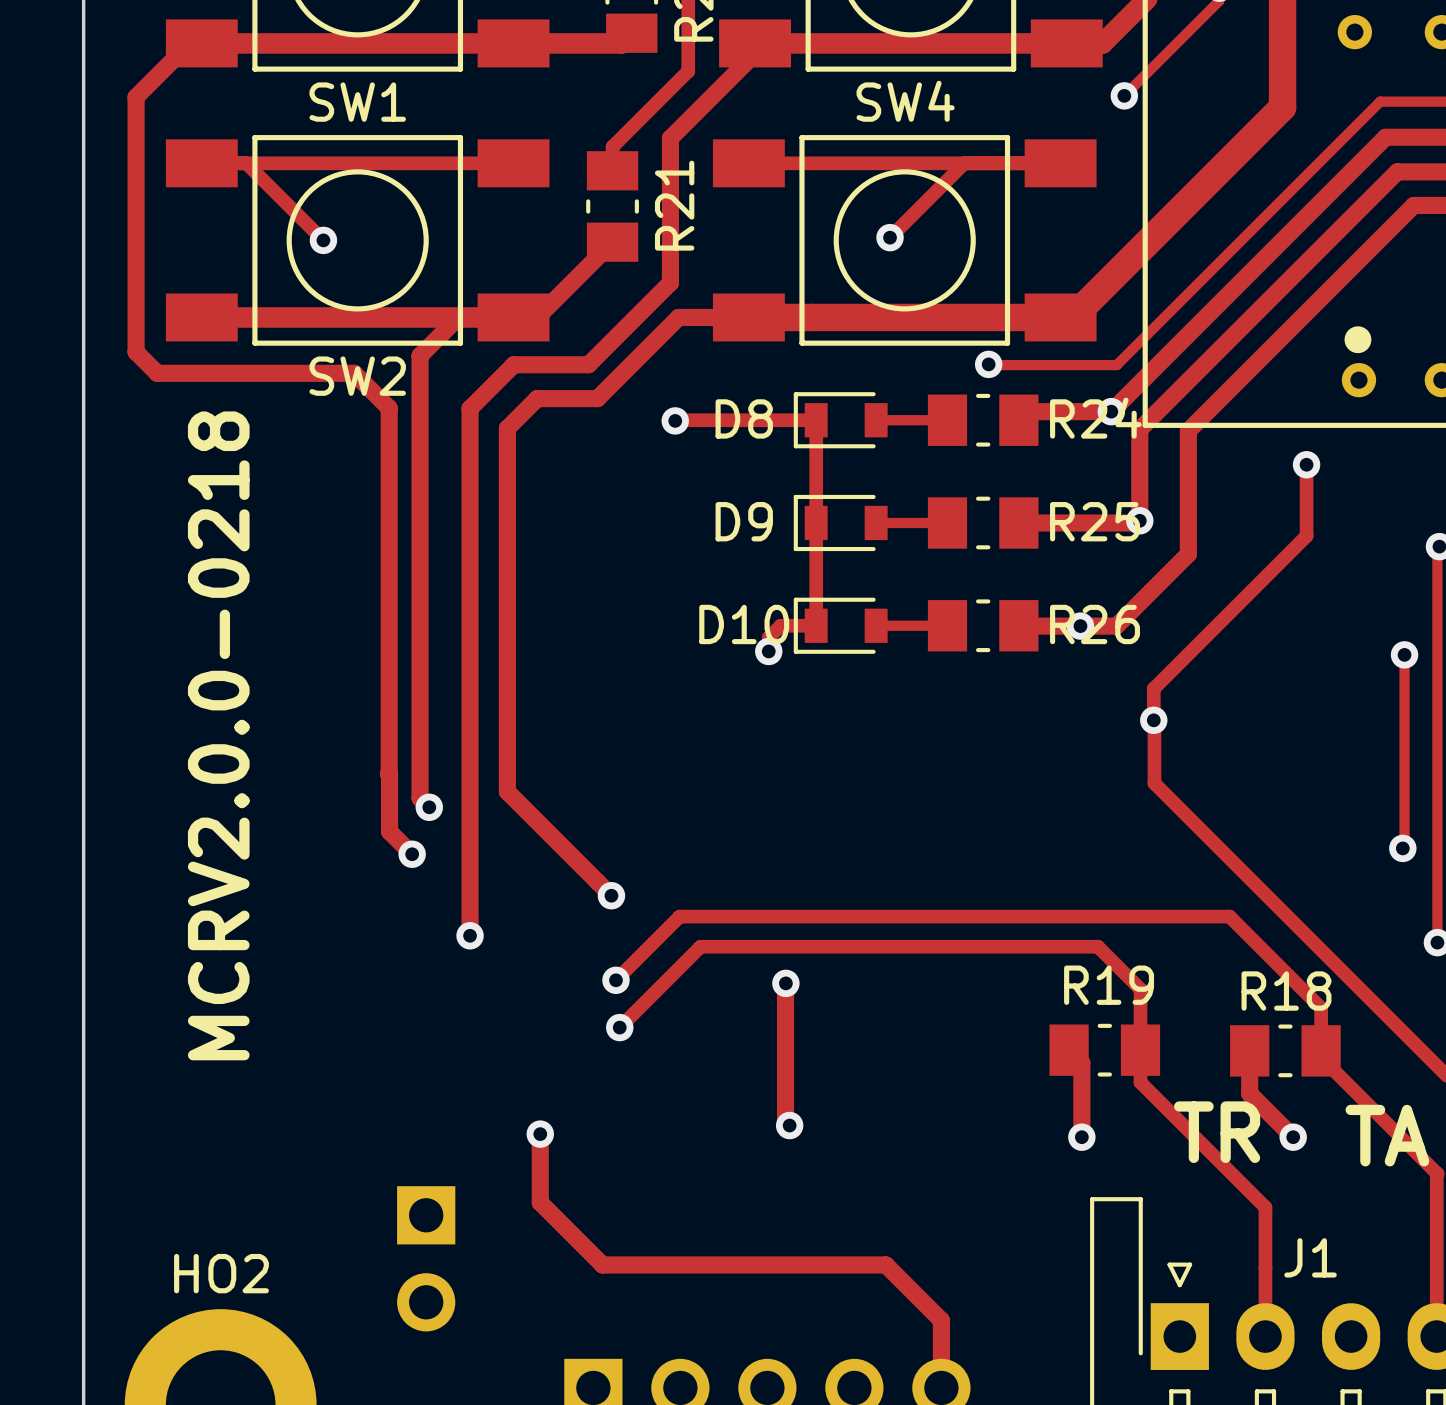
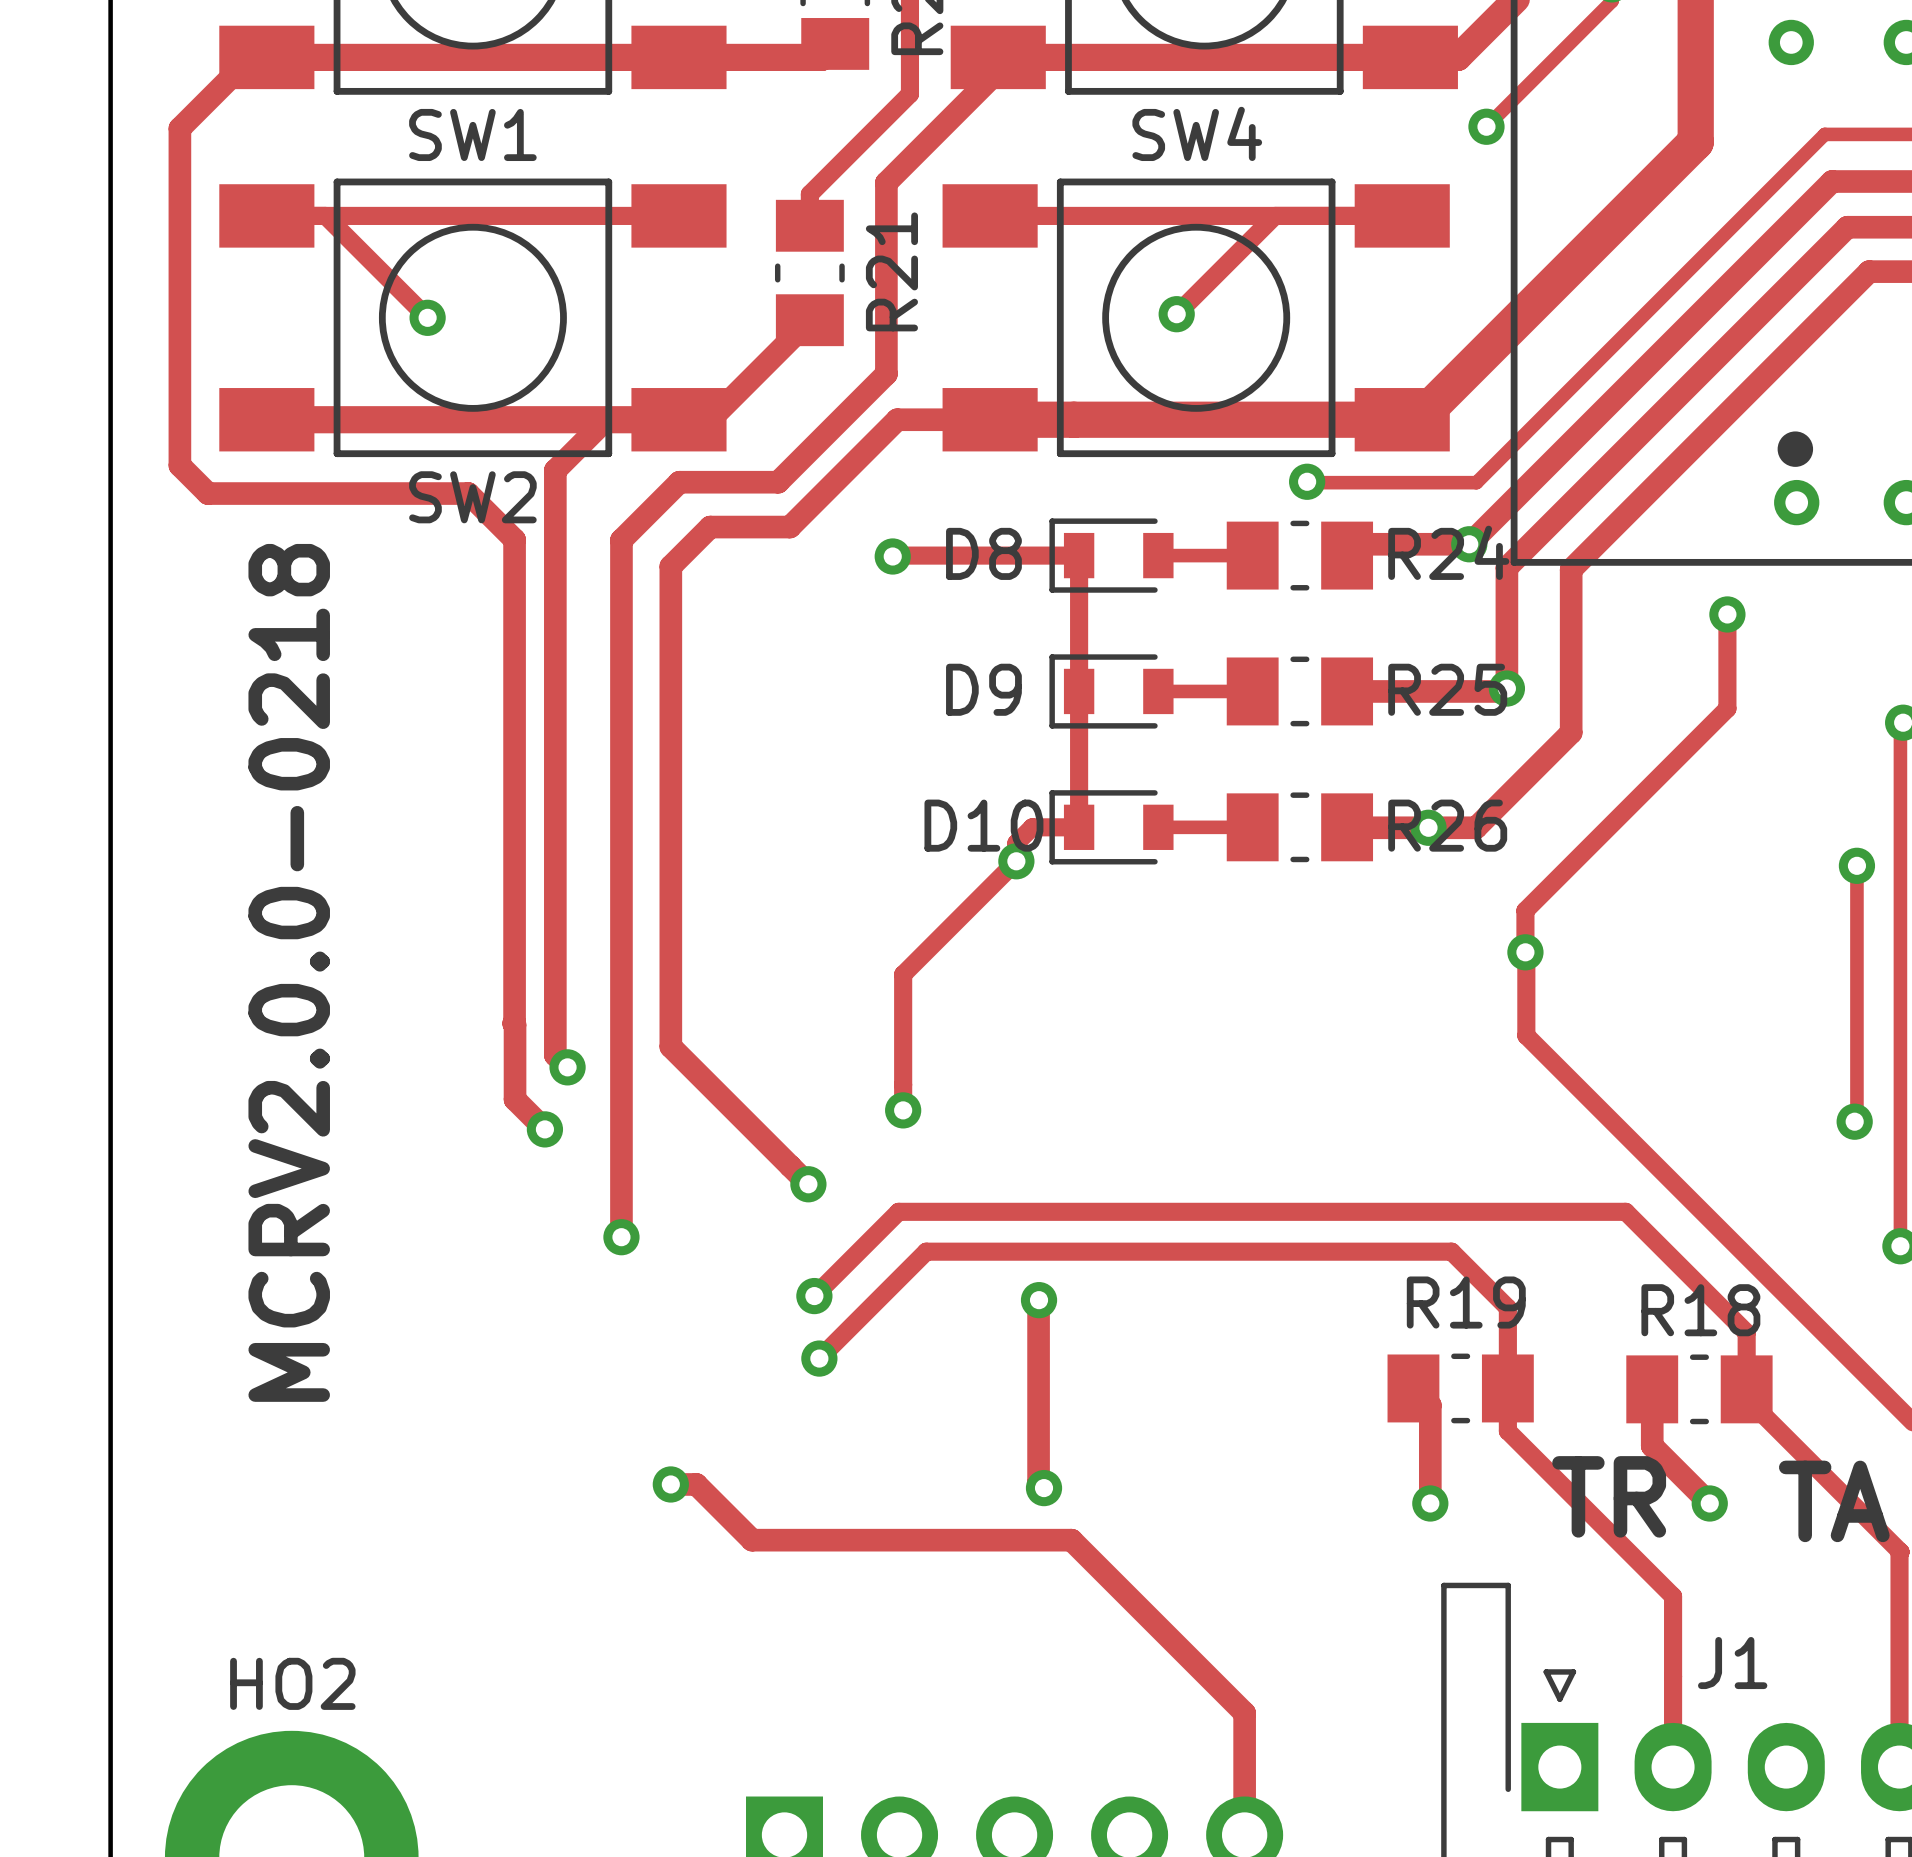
track: none -> (1016, 861) (903, 974) (903, 1110)
via: none -> (903, 1110)
track: (540, 1134) (540, 1202) (602, 1264) (885, 1264) (941, 1320) -> (670, 1484) (696, 1484) (752, 1540) (1071, 1540) (1244, 1713) (1244, 1745)
via position: (540, 1134) -> (670, 1484)
part: (426, 1258) -> none

